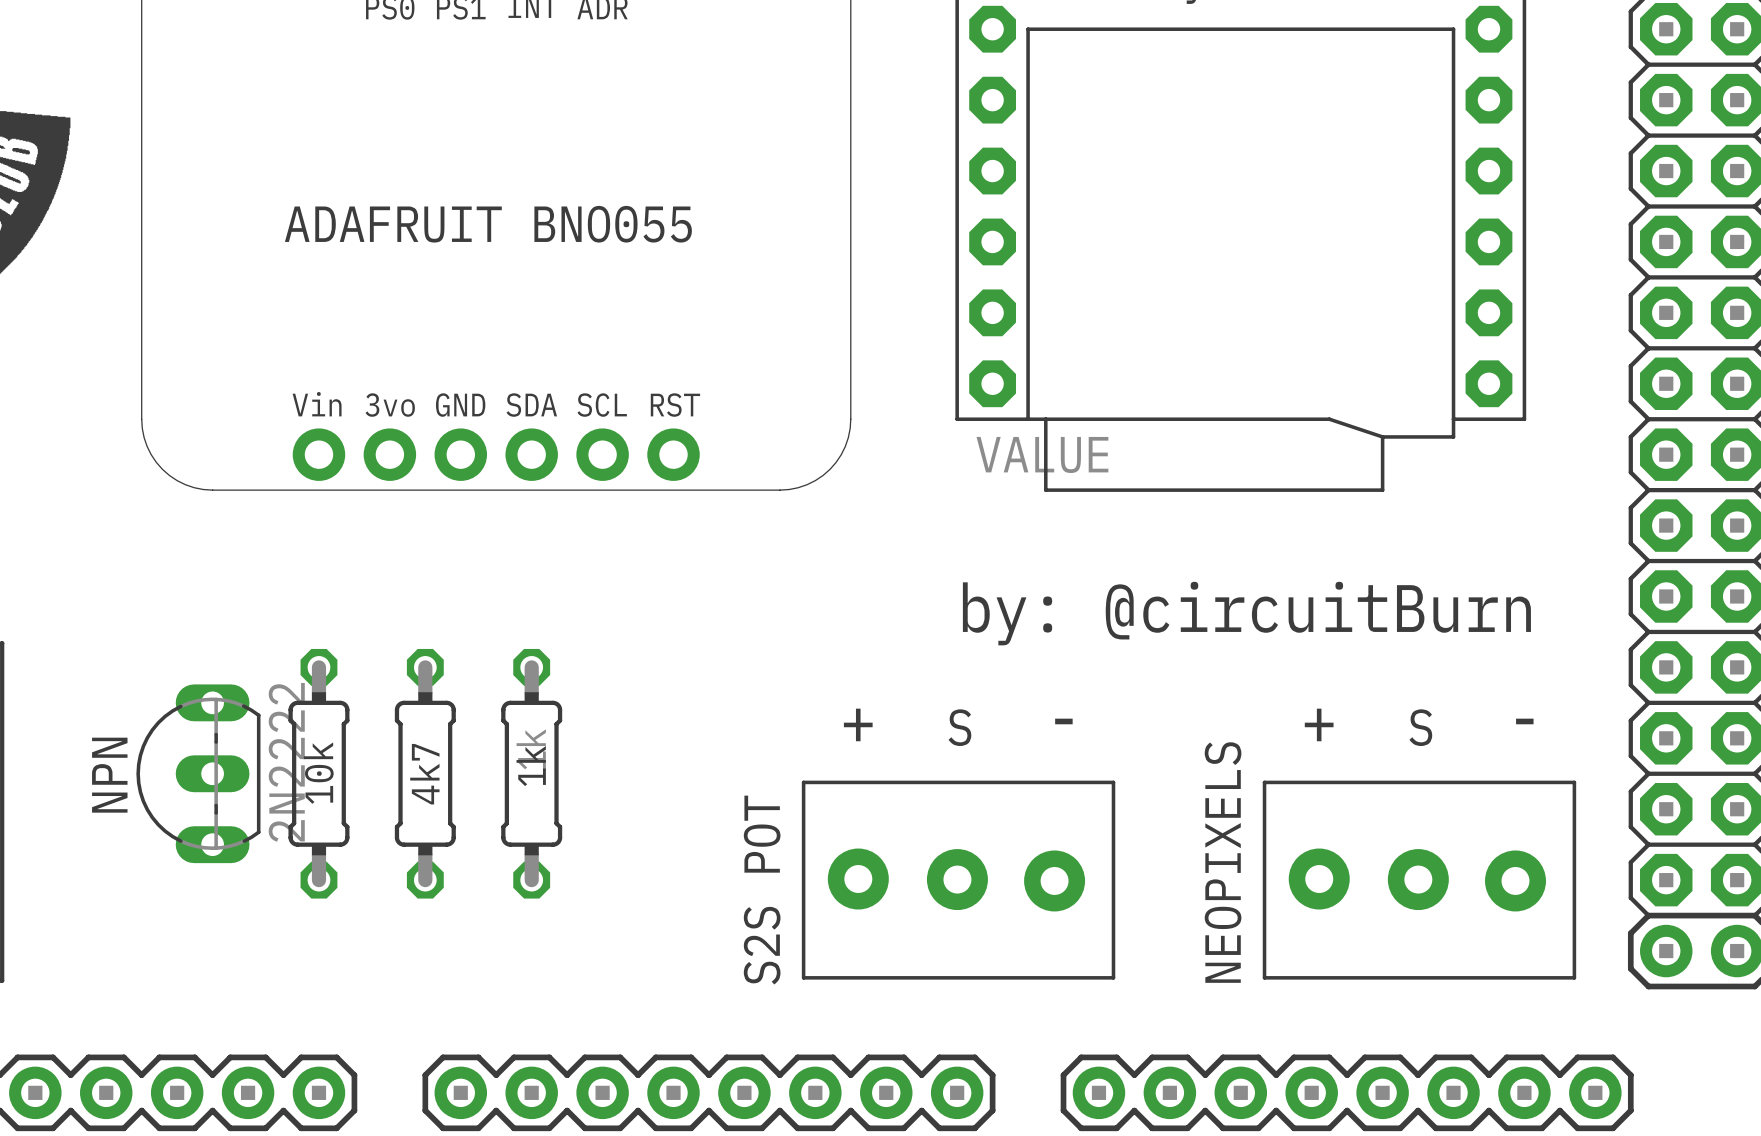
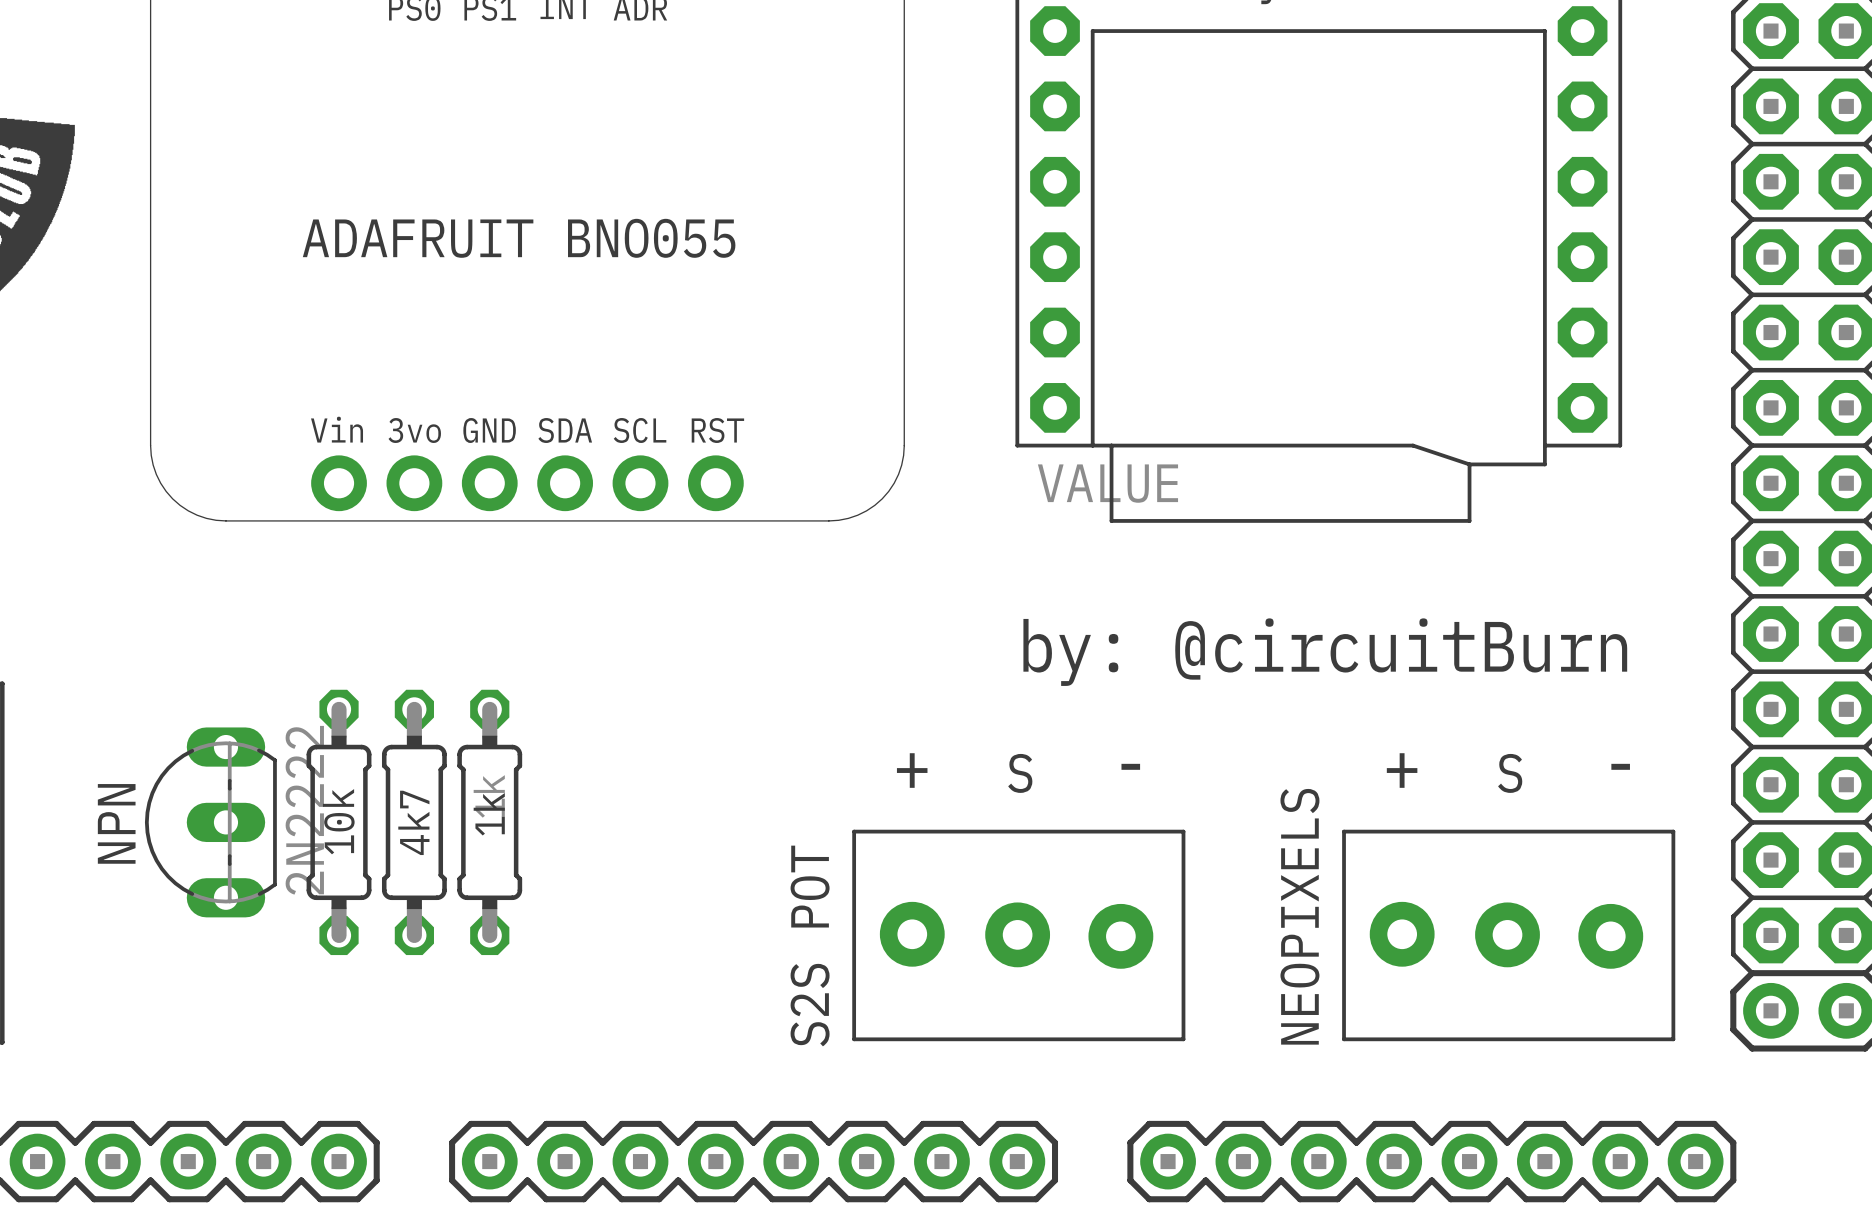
text position: 1k (531, 766) -> 1k (489, 814)
part position: (425, 773) -> (414, 822)
part position: (531, 773) -> (489, 822)
text position: 4k7 (424, 774) -> 4k7 (413, 822)

